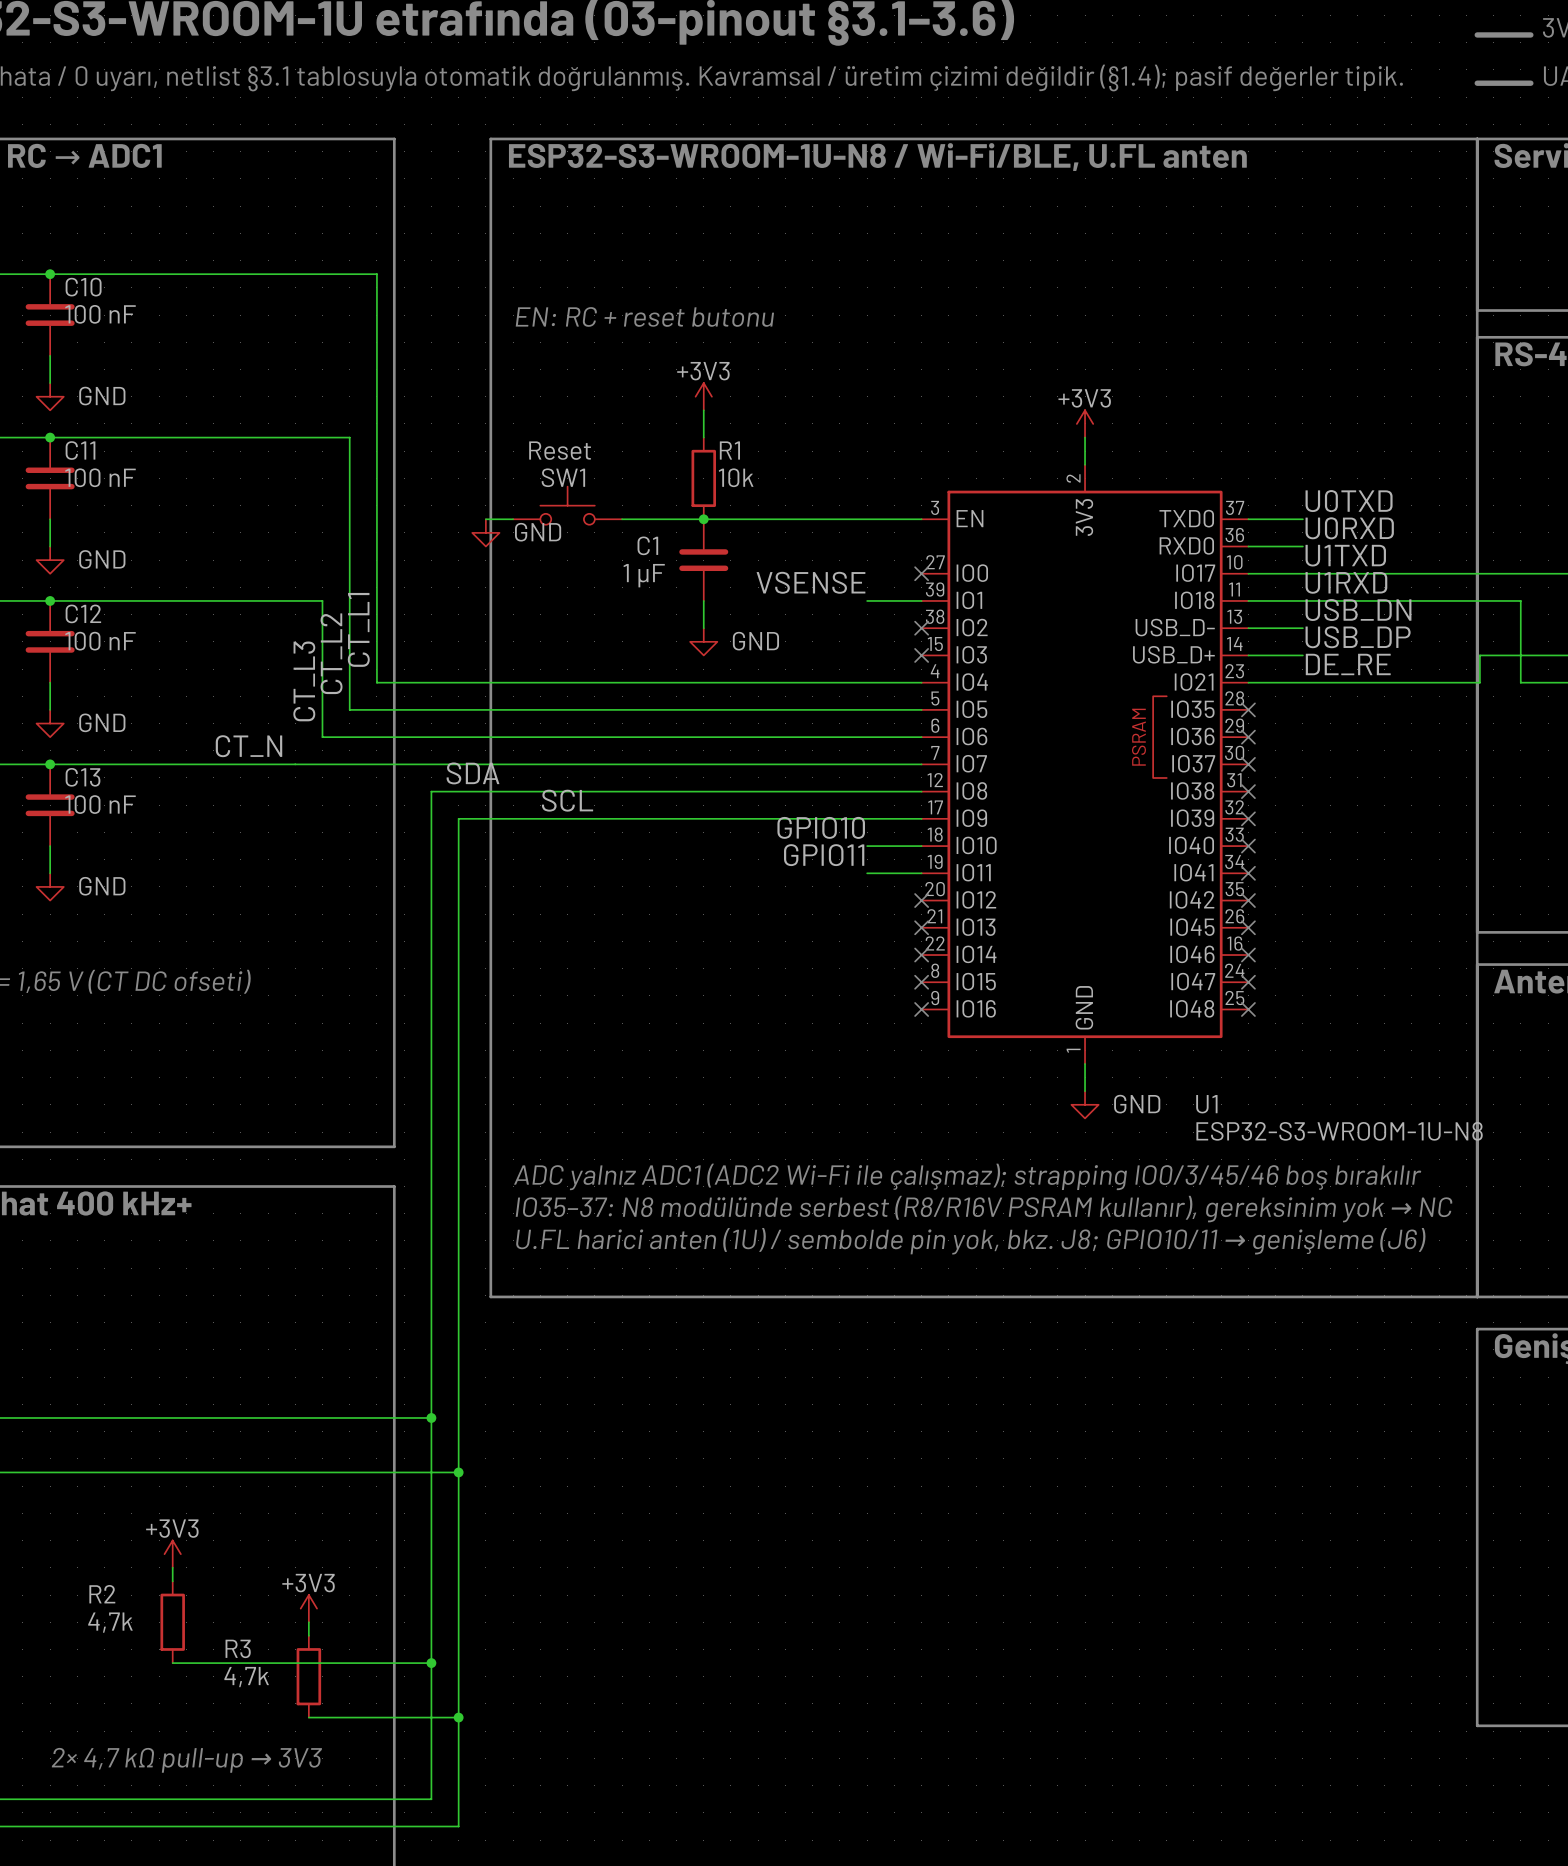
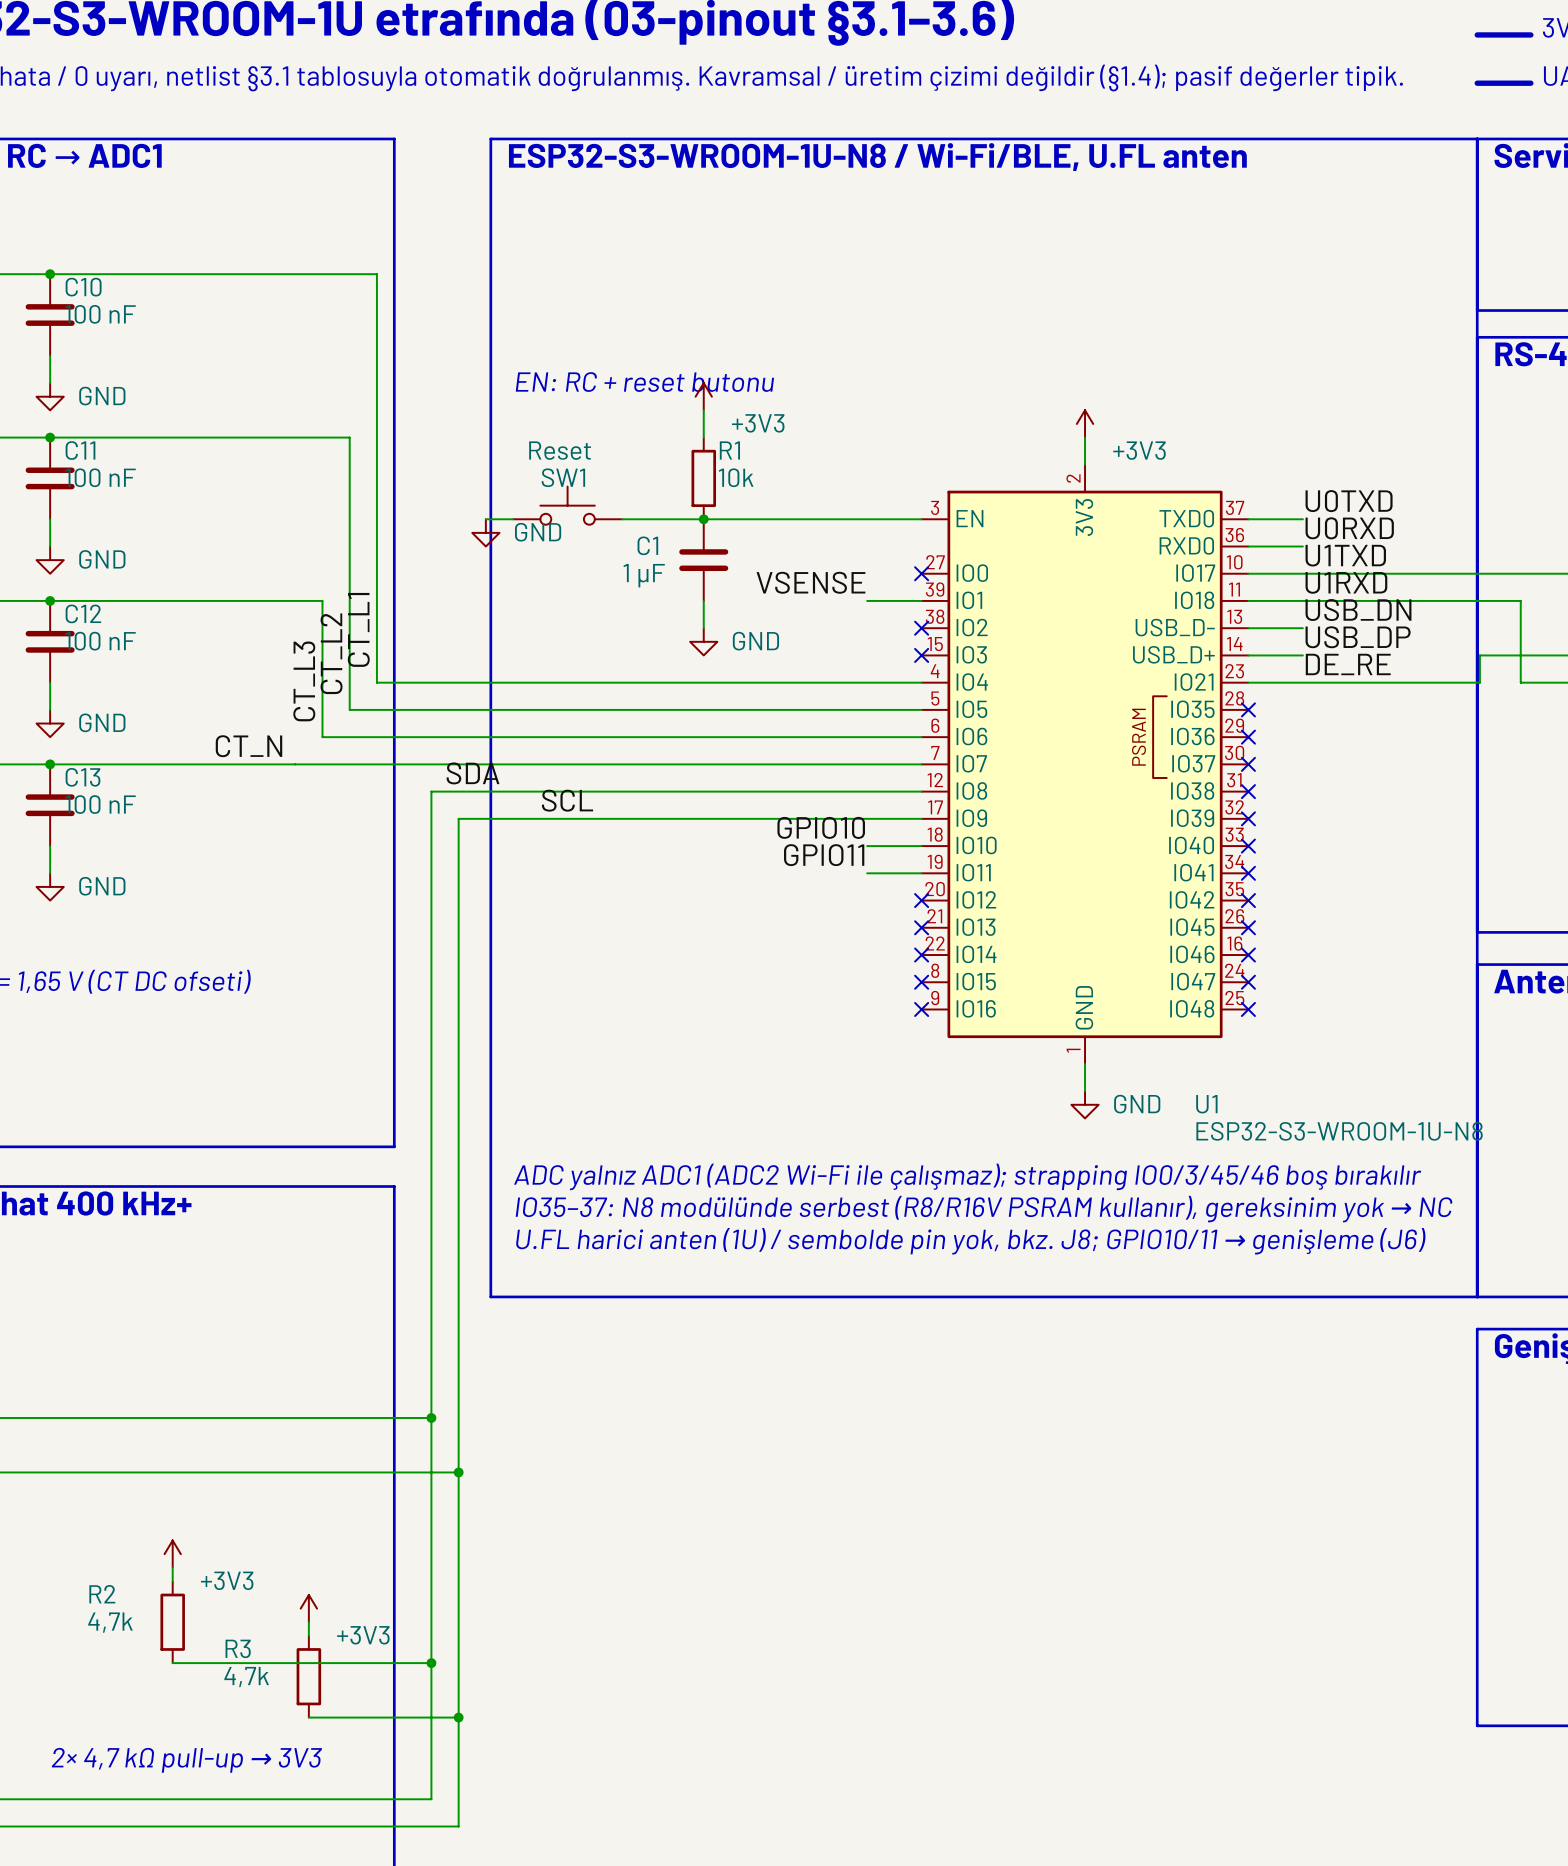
text position: EN: RC + reset butonu (644, 316) -> EN: RC + reset butonu (644, 382)
power symbol text position: +3V3 (703, 371) -> +3V3 (758, 423)
power symbol text position: +3V3 (1084, 398) -> +3V3 (1139, 450)
power symbol text position: +3V3 (172, 1528) -> +3V3 (227, 1580)
power symbol text position: +3V3 (308, 1583) -> +3V3 (363, 1635)

